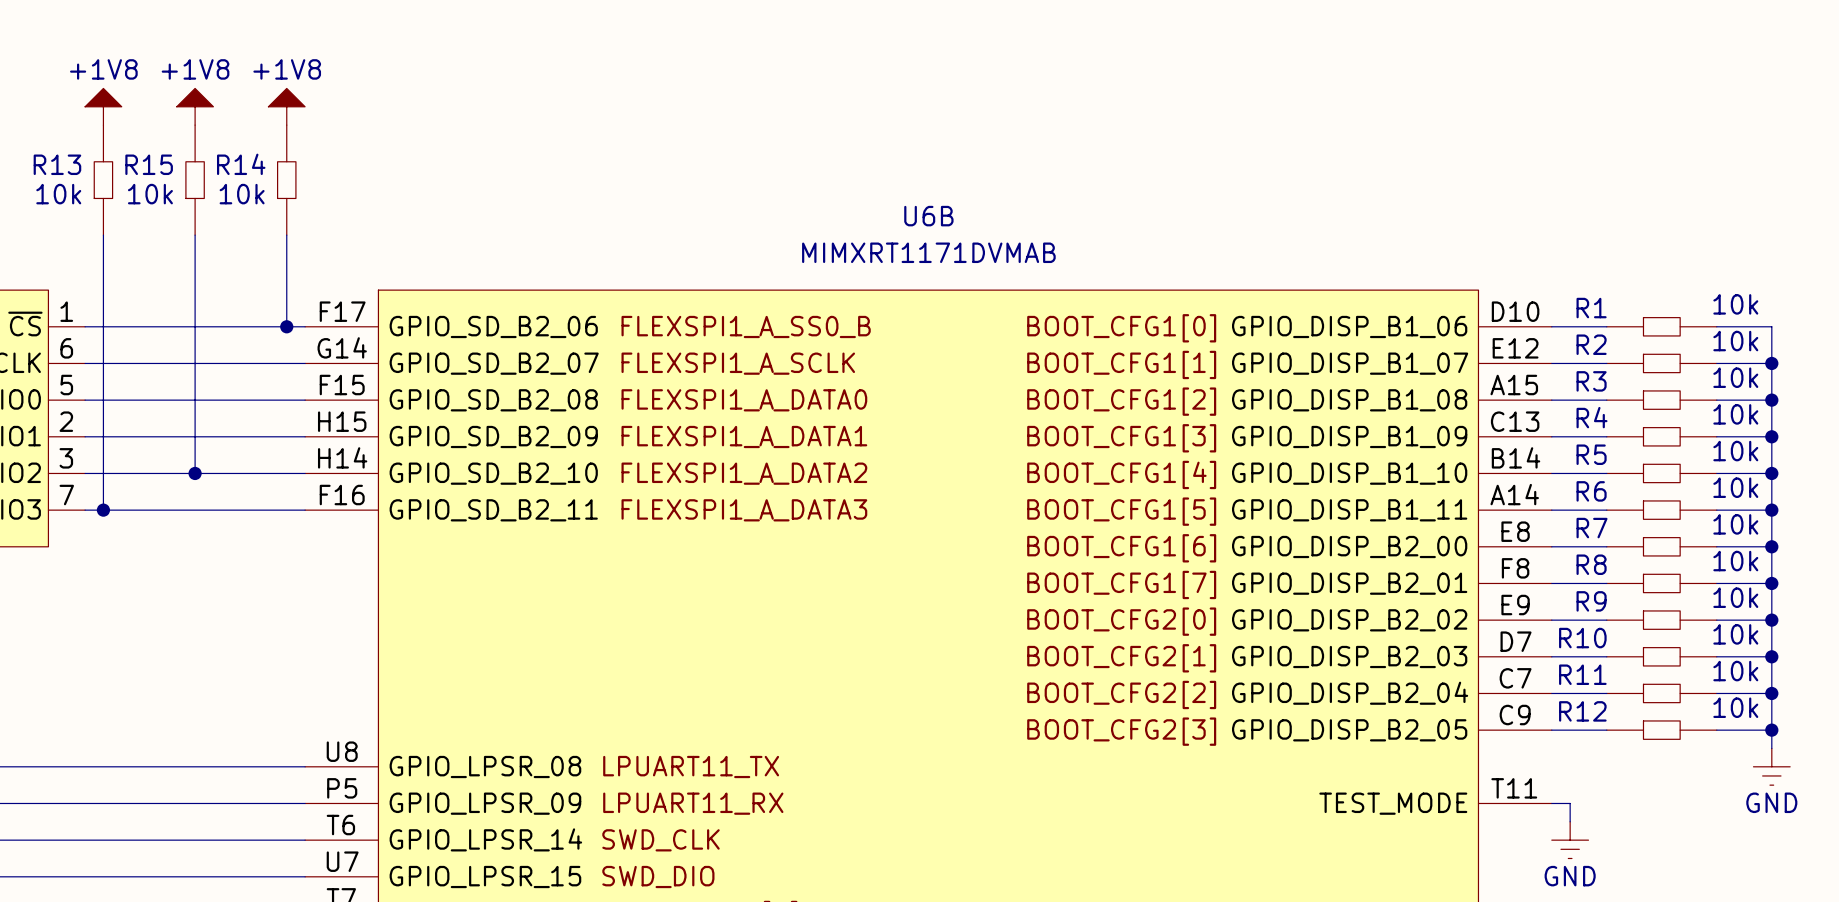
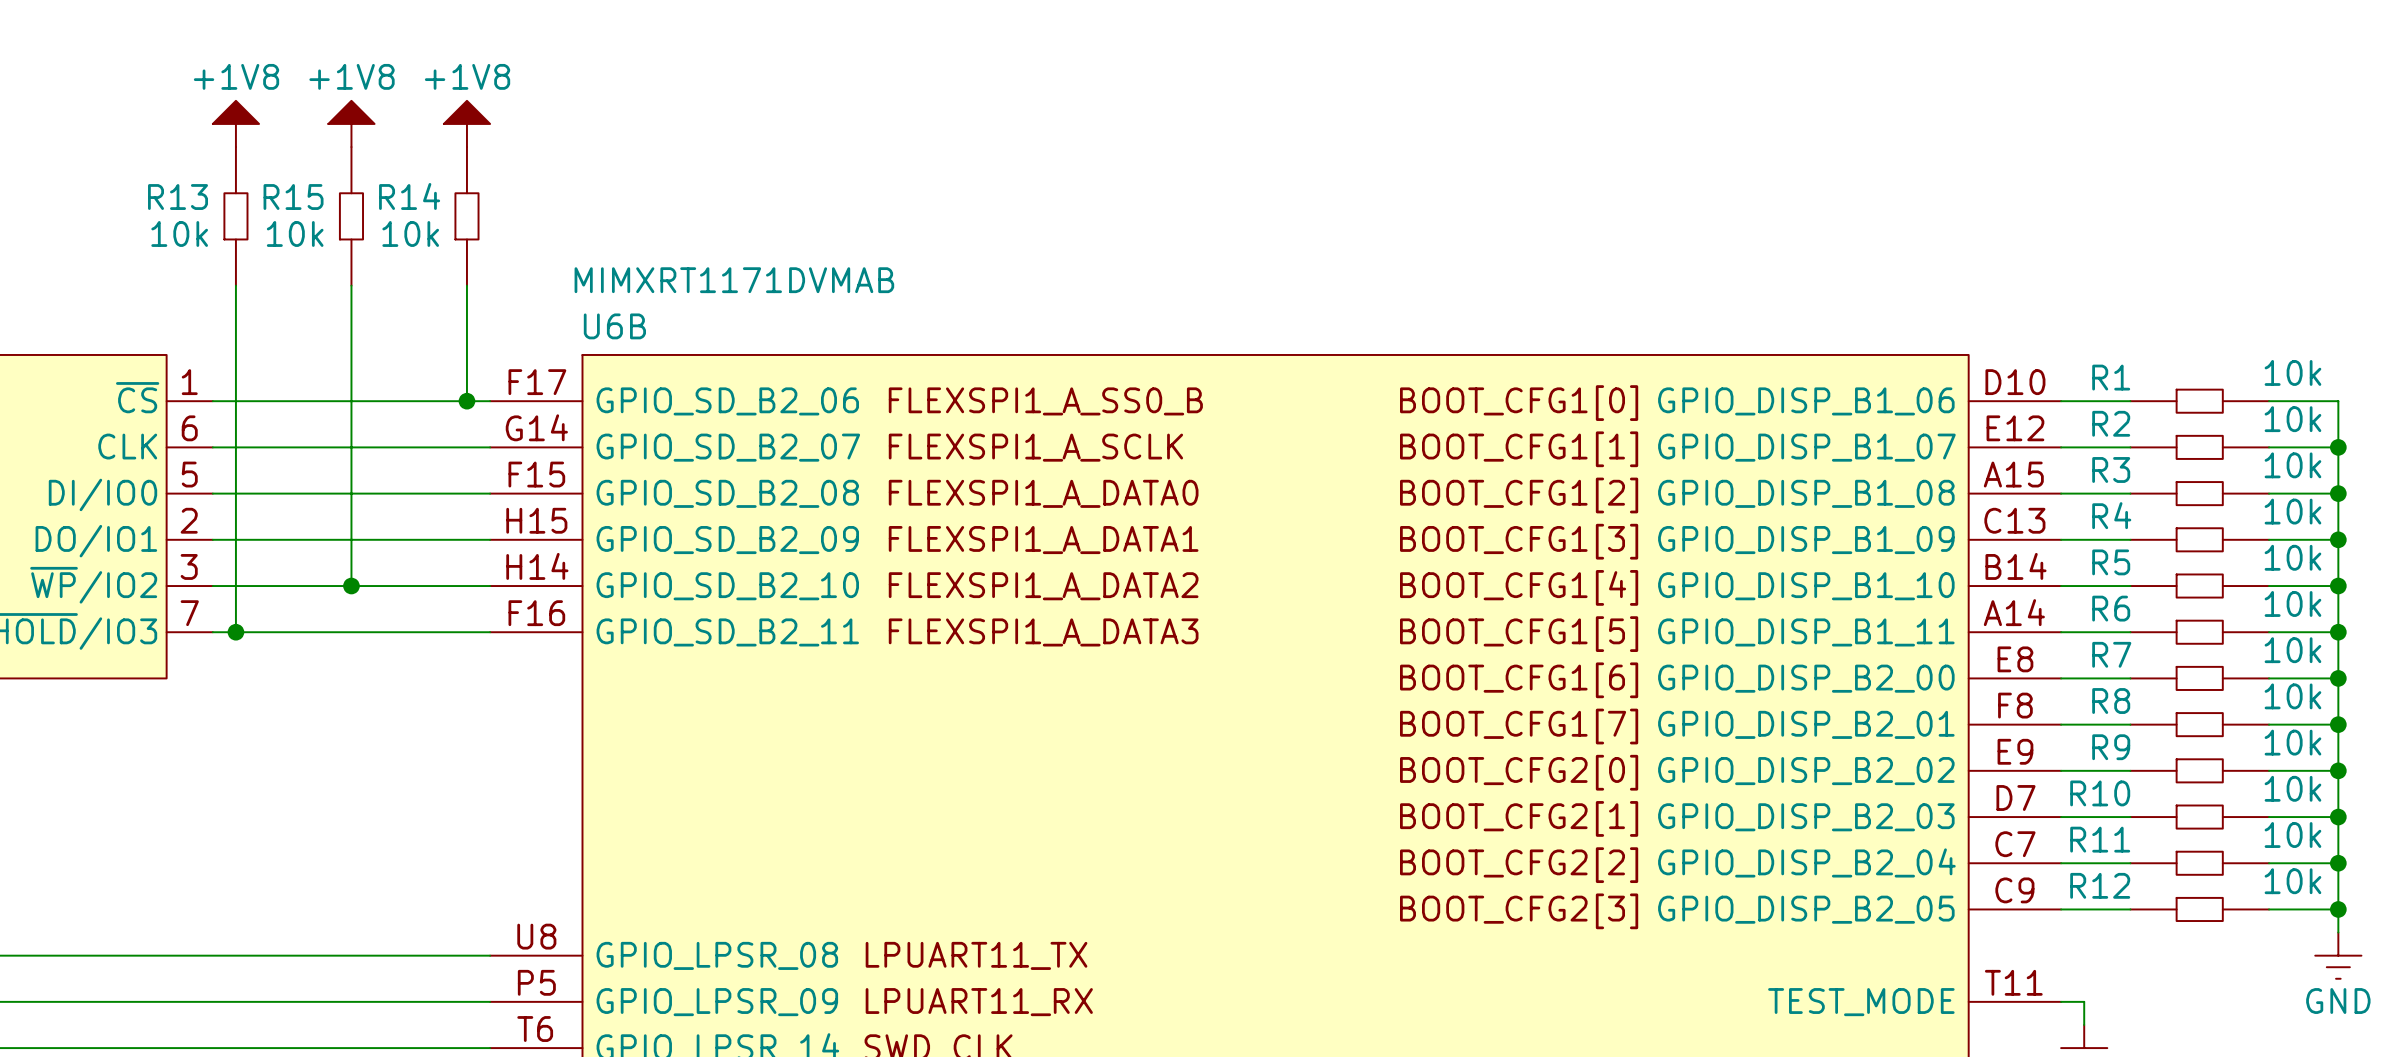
U6B name position: U6B (928, 216) -> U6B (614, 326)
U6B value position: MIMXRT1171DVMAB (928, 252) -> MIMXRT1171DVMAB (734, 280)

